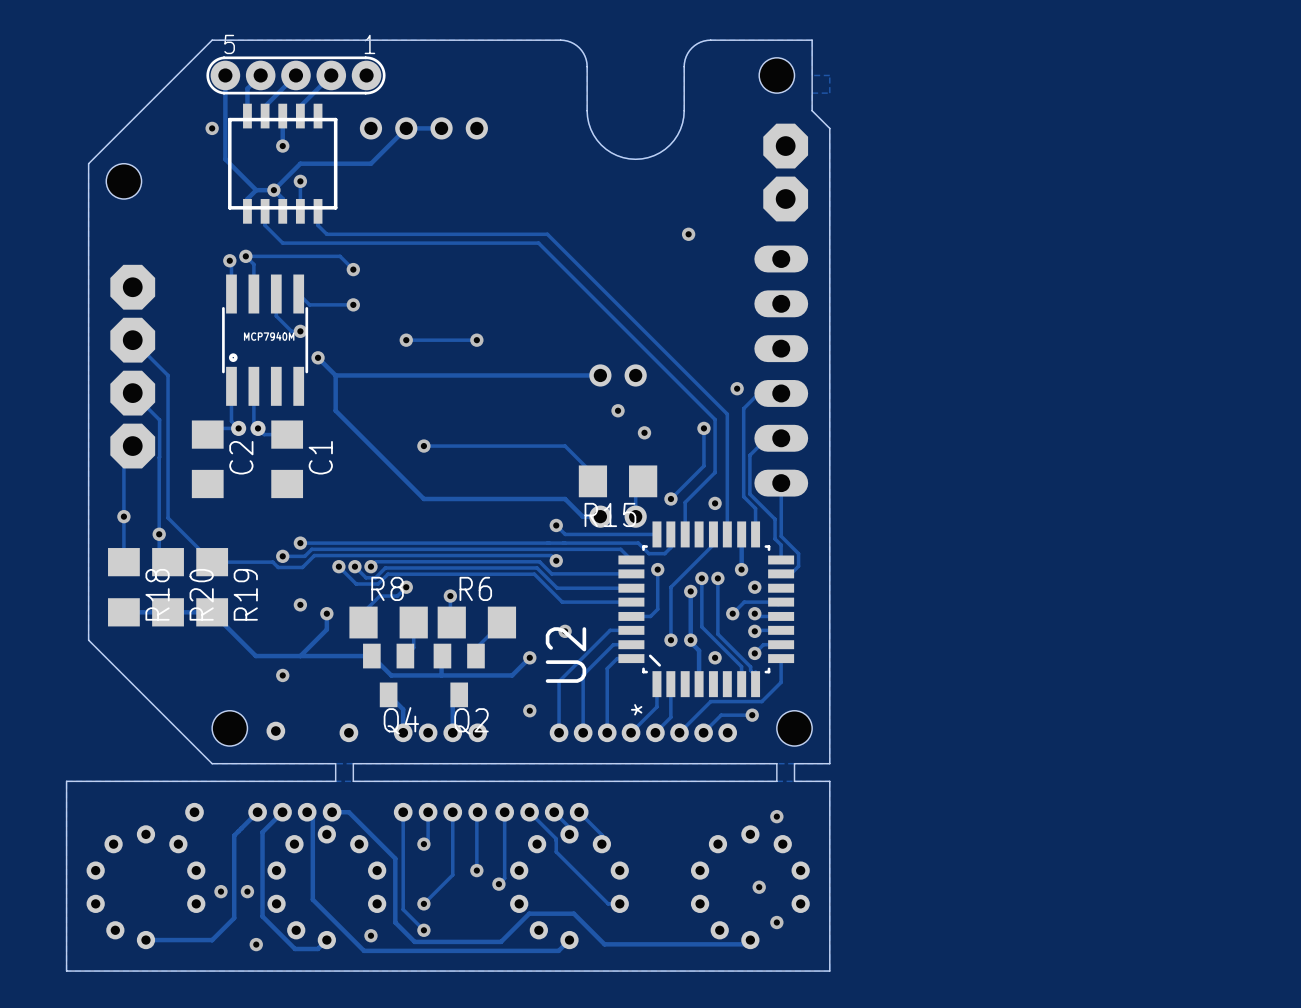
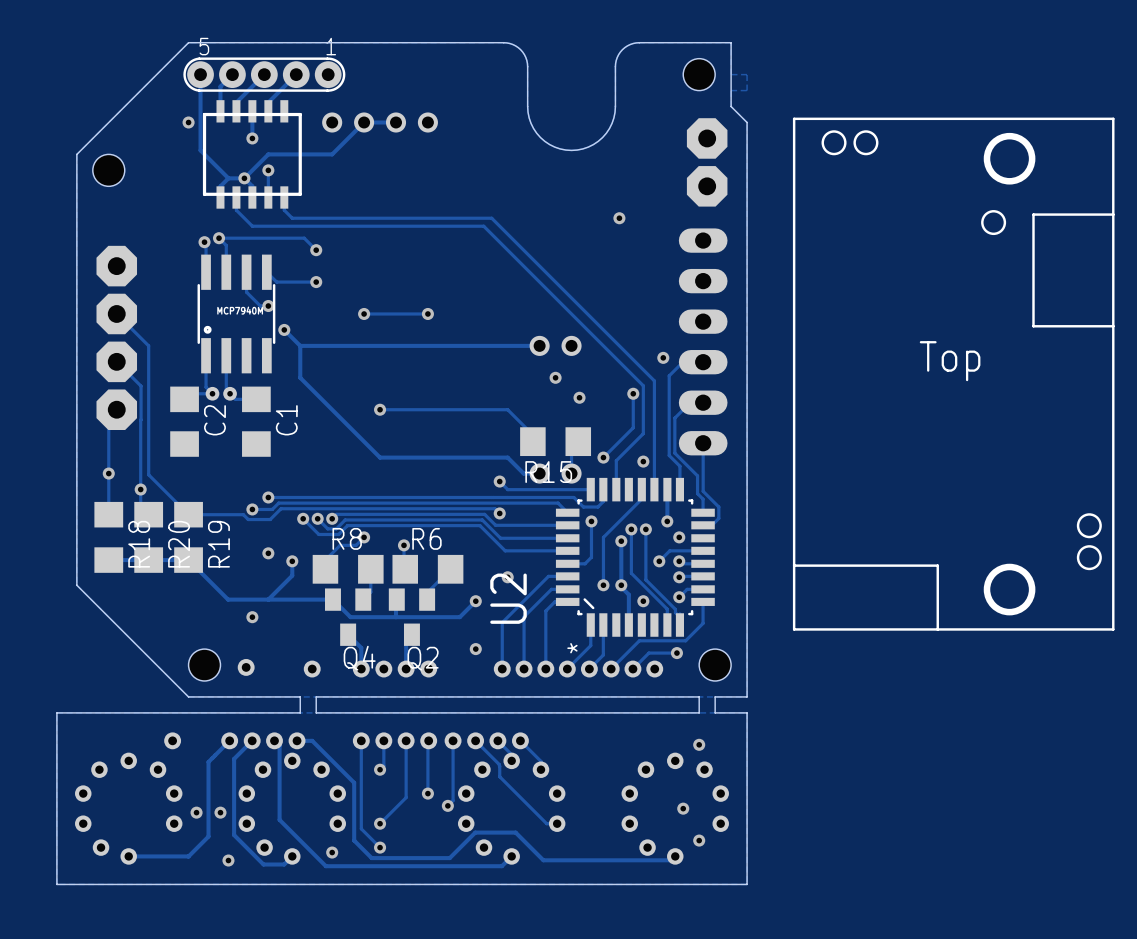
line: none -> (1113, 118) (1113, 629) (794, 629) (794, 118) (1113, 118)
drawing: none -> [821, 130, 879, 156]
drawing: none -> [983, 132, 1036, 185]
drawing: none -> [981, 210, 1007, 236]
line: none -> (1113, 214) (1033, 214) (1033, 326) (1113, 326)
text: none -> Top (950, 361)
drawing: none -> [1076, 513, 1102, 571]
drawing: none -> [983, 563, 1036, 616]
line: none -> (794, 565) (937, 565) (937, 629)

